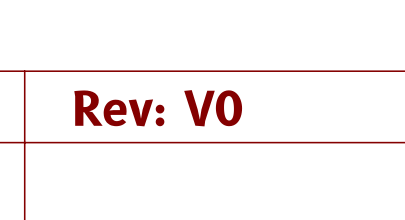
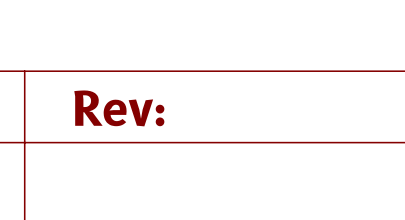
title block: Rev: V0 (158, 108) -> Rev: (119, 108)

